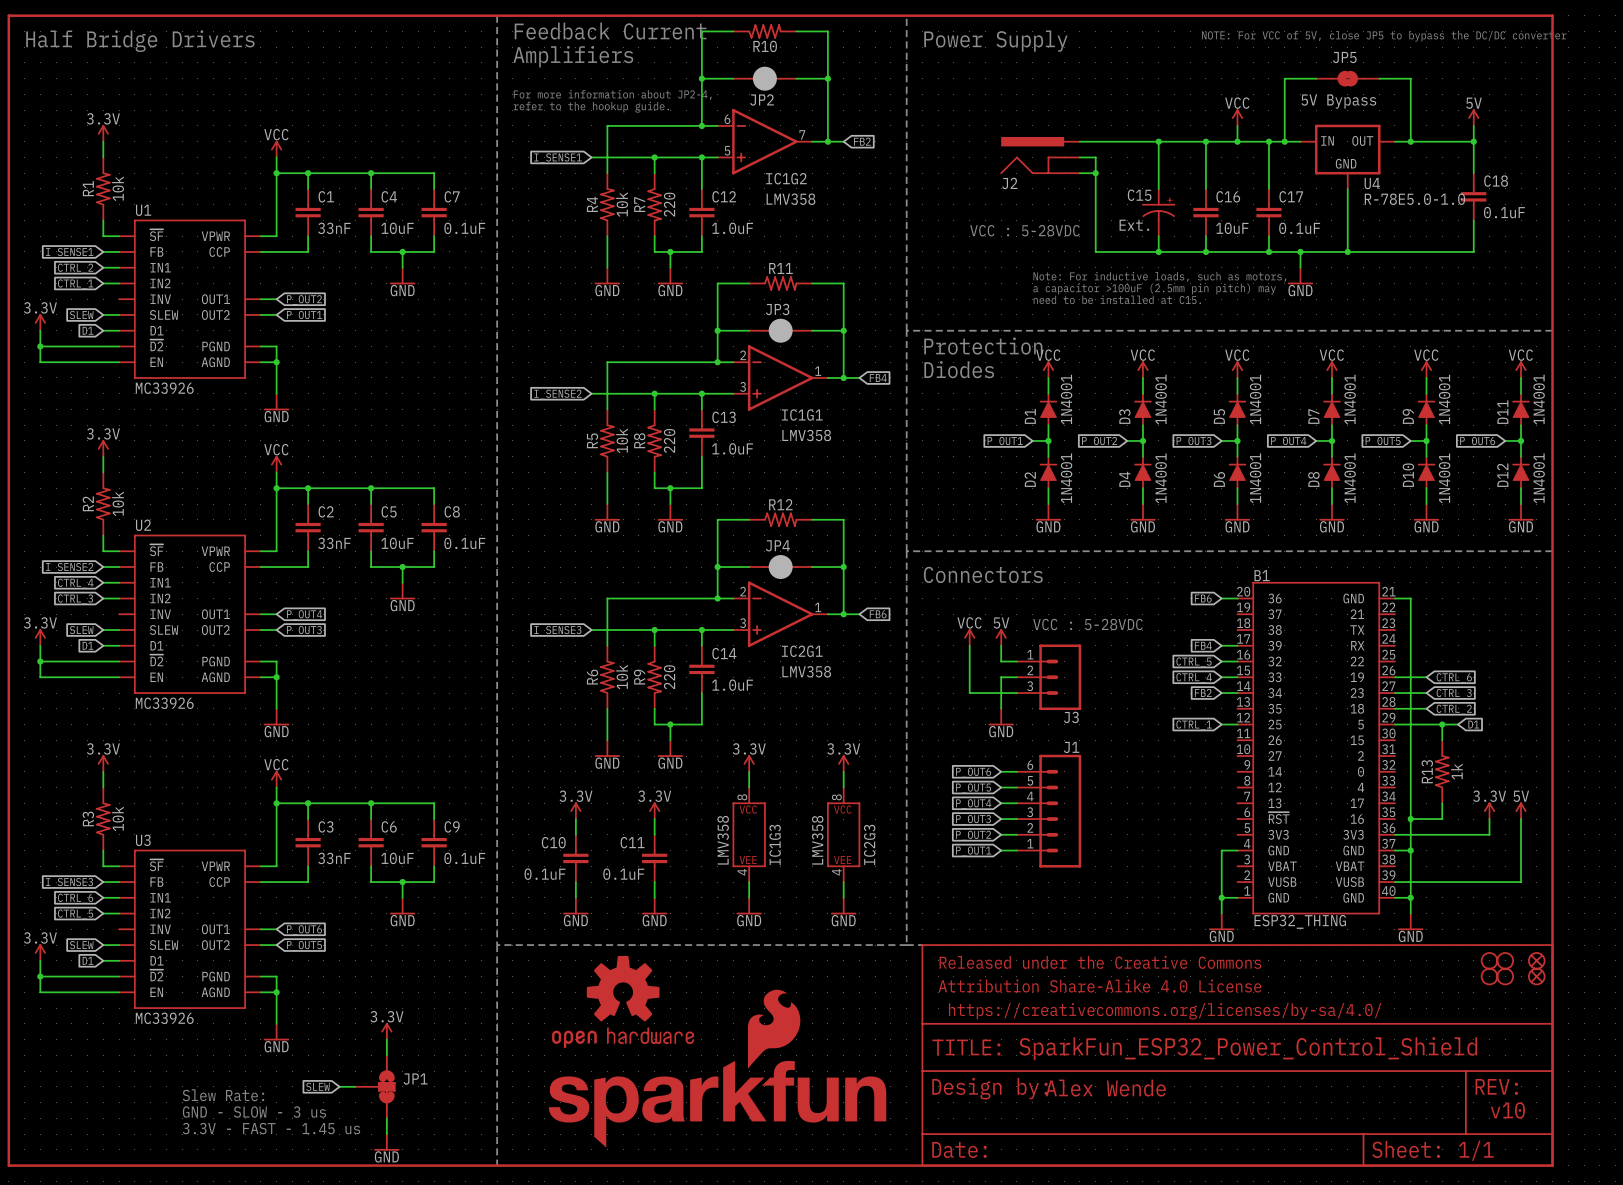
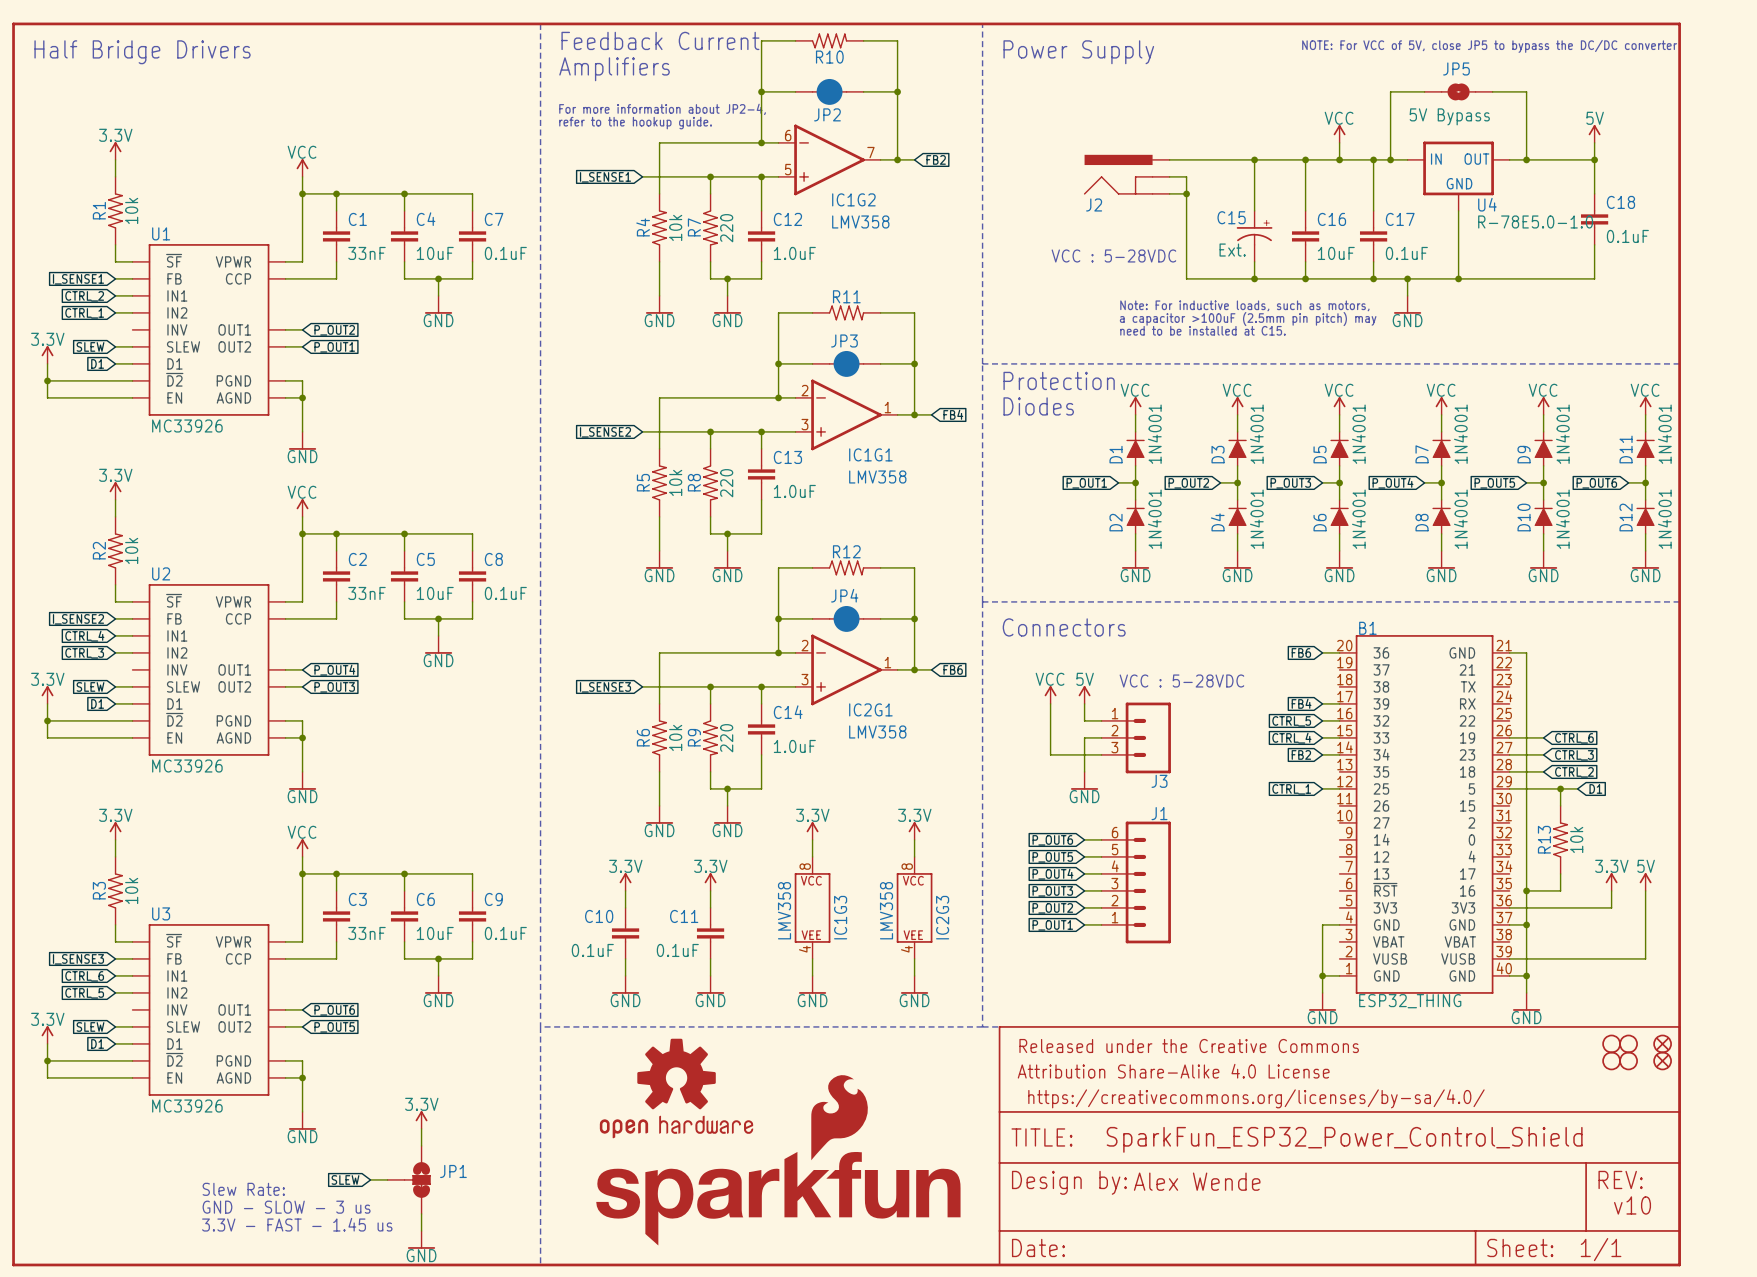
R13 value: 1k (1456, 771) -> 10k (1576, 839)

